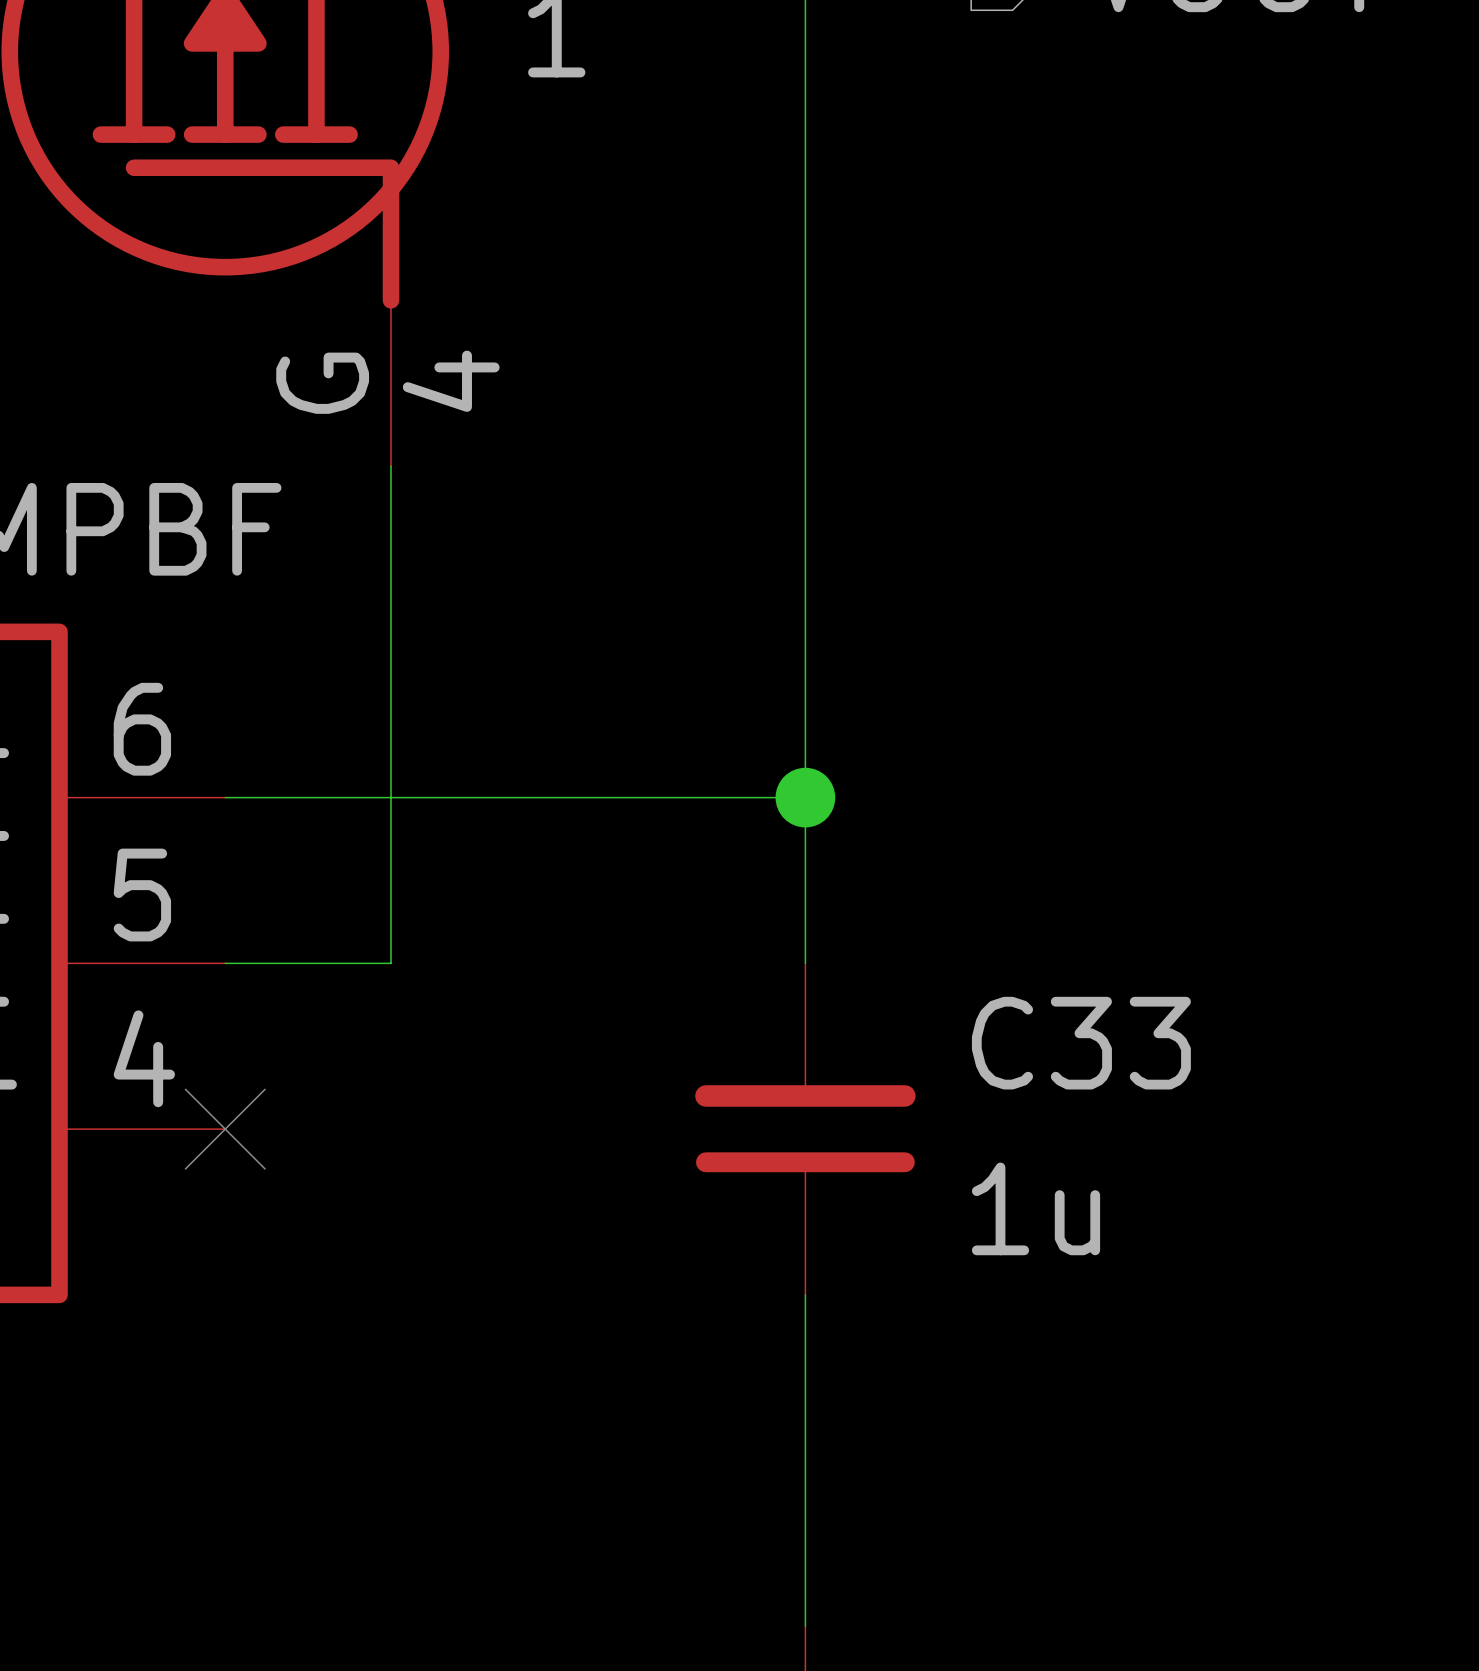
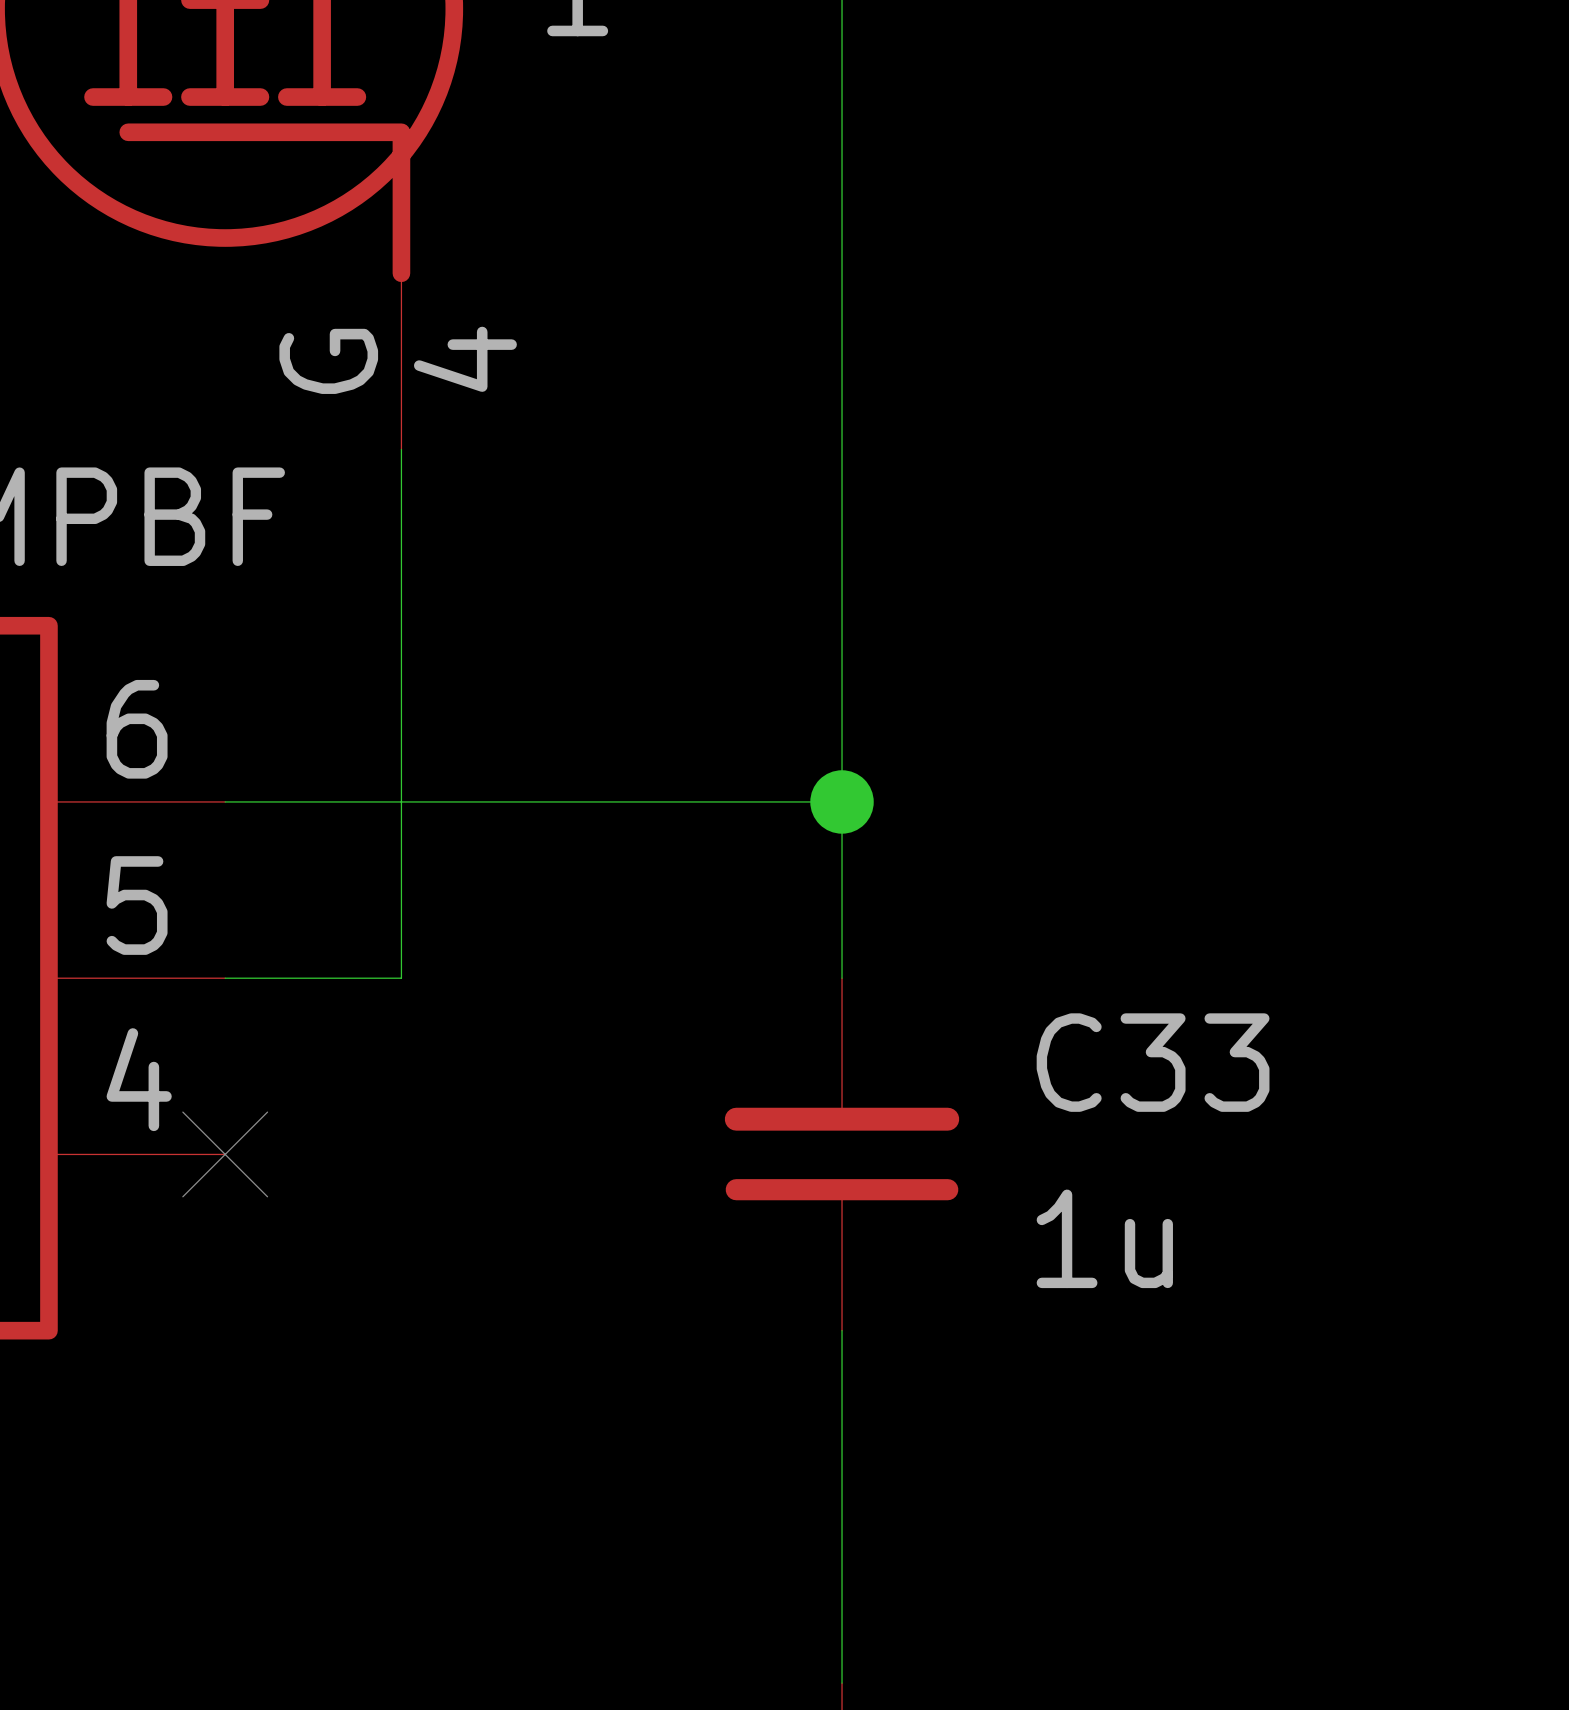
C33 name position: C33 (1081, 1043) -> C33 (1153, 1062)
C33 text position: 1u (1036, 1208) -> 1u (1104, 1238)

